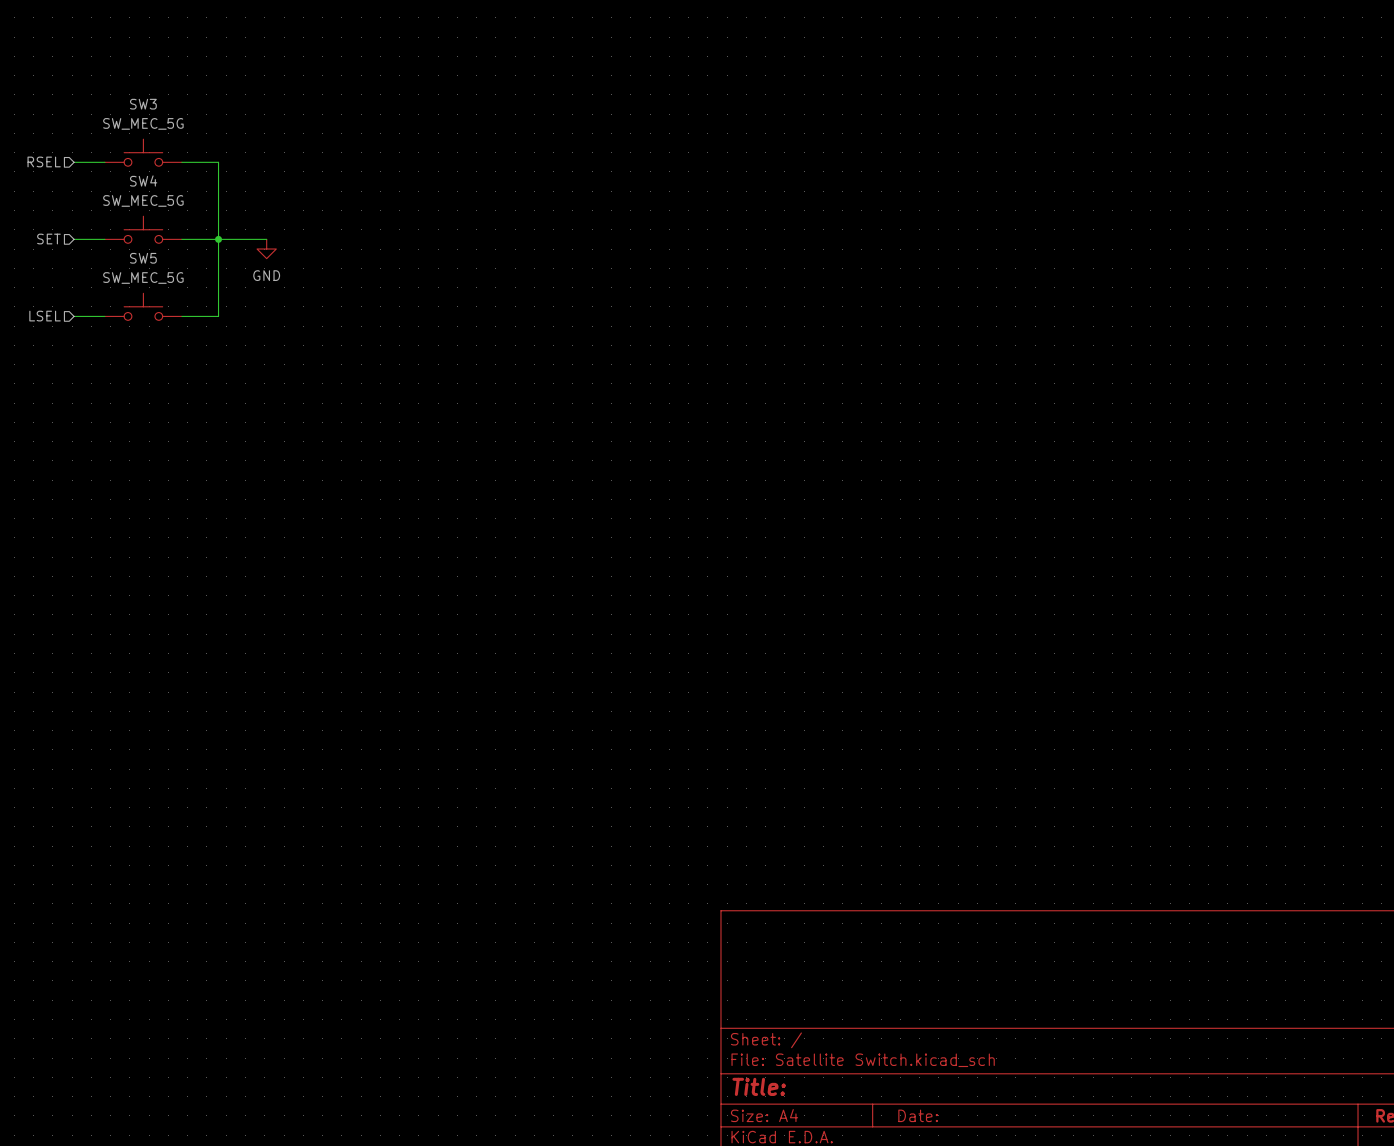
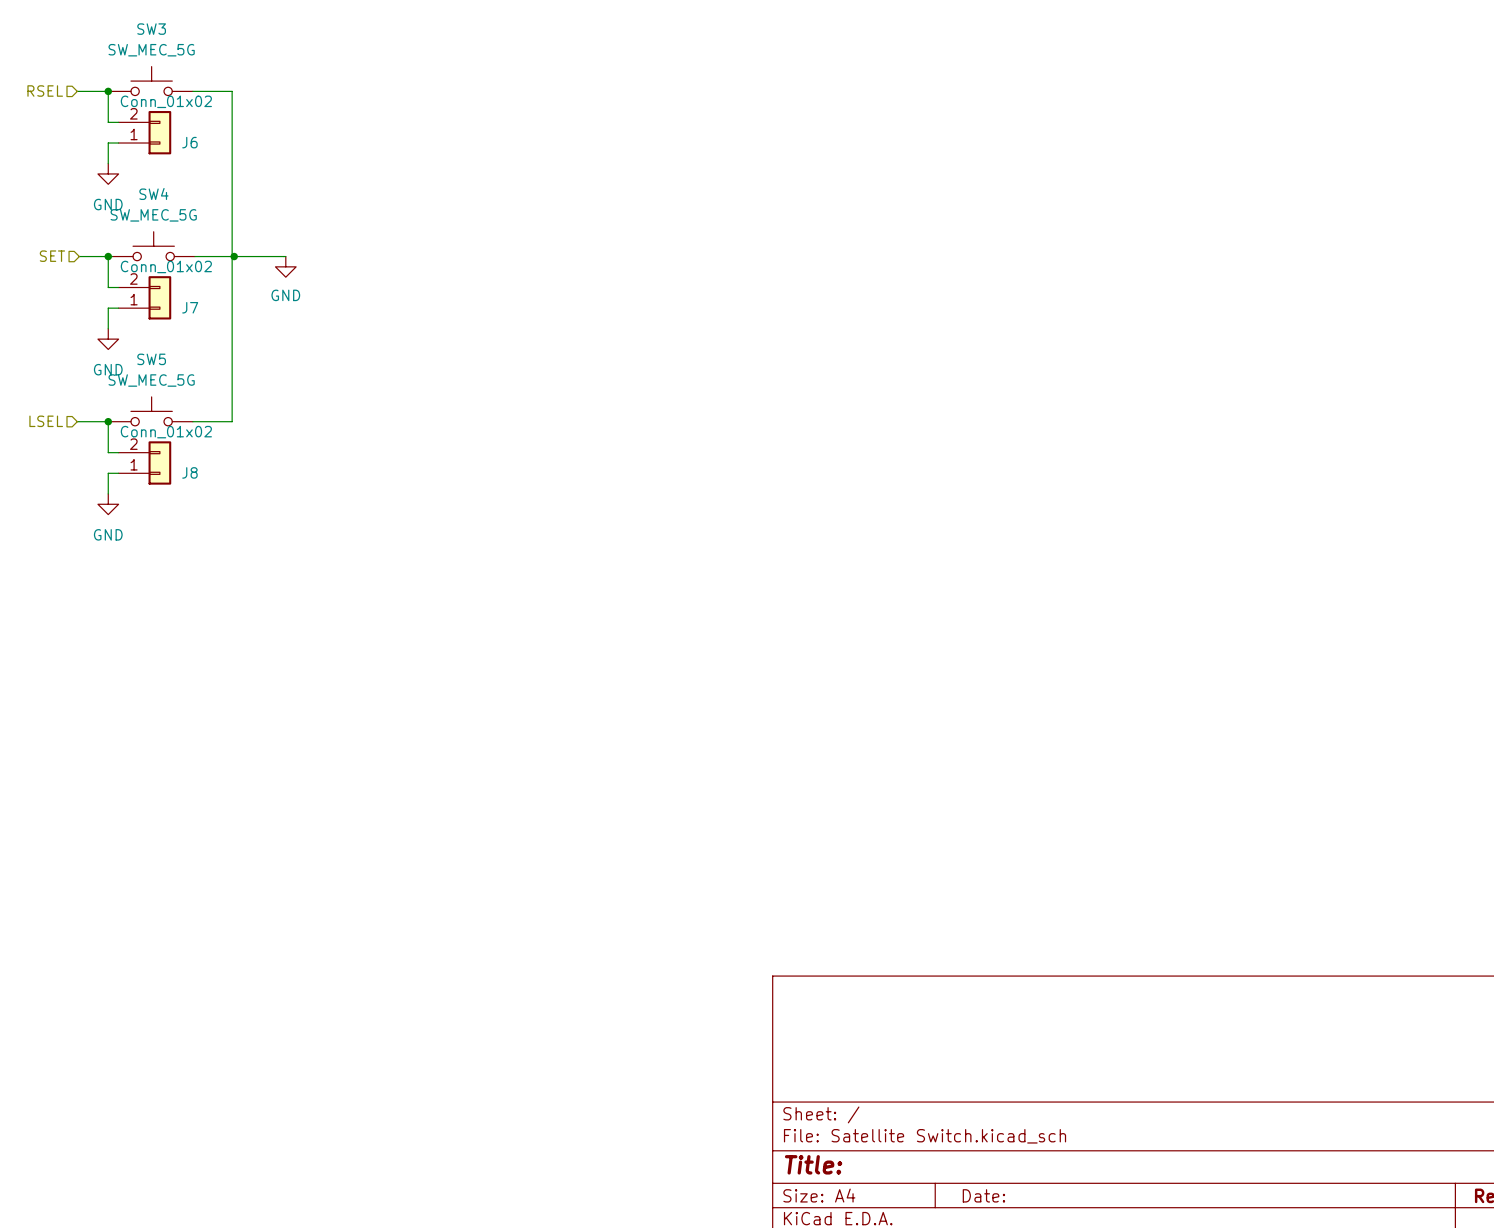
wire: none -> (108, 91) (108, 122) (118, 122)
junction: none -> (108, 91)
wire: none -> (192, 91) (232, 91) (232, 421) (192, 421)
J6: none -> Conn_01x02 (144, 132)
wire: none -> (118, 143) (108, 143) (108, 163)
SW3 position: (143, 152) -> (151, 81)
hierarchical label position: RSEL (44, 161) -> RSEL (45, 91)
wire: (74, 162) (104, 162) -> (77, 91) (110, 91)
power symbol: none -> GND (108, 173)
wire: (181, 162) (218, 162) (218, 316) (181, 316) -> none
wire: none -> (108, 256) (108, 287) (118, 287)
junction: none -> (108, 256)
J7: none -> Conn_01x02 (144, 297)
wire: none -> (118, 308) (108, 308) (108, 328)
SW5 position: (143, 306) -> (151, 411)
hierarchical label position: LSEL (45, 316) -> LSEL (46, 421)
wire: (74, 316) (104, 316) -> (77, 421) (110, 421)
power symbol: none -> GND (108, 339)
wire: none -> (108, 421) (108, 452) (118, 452)
junction: none -> (108, 421)
J8: none -> Conn_01x02 (144, 462)
wire: none -> (118, 473) (108, 473) (108, 493)
power symbol: none -> GND (108, 504)

